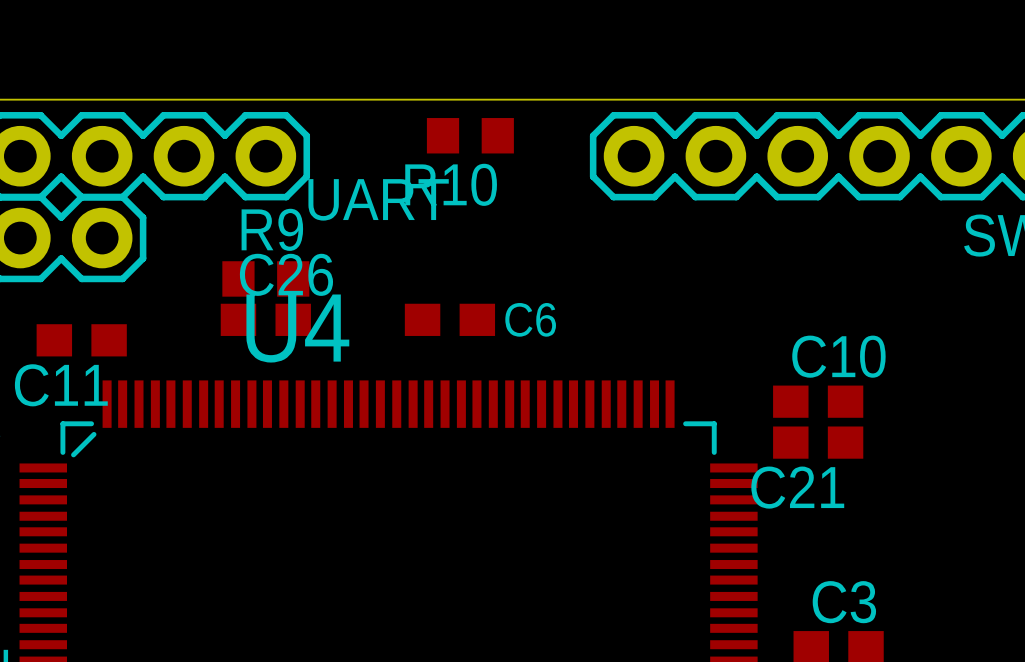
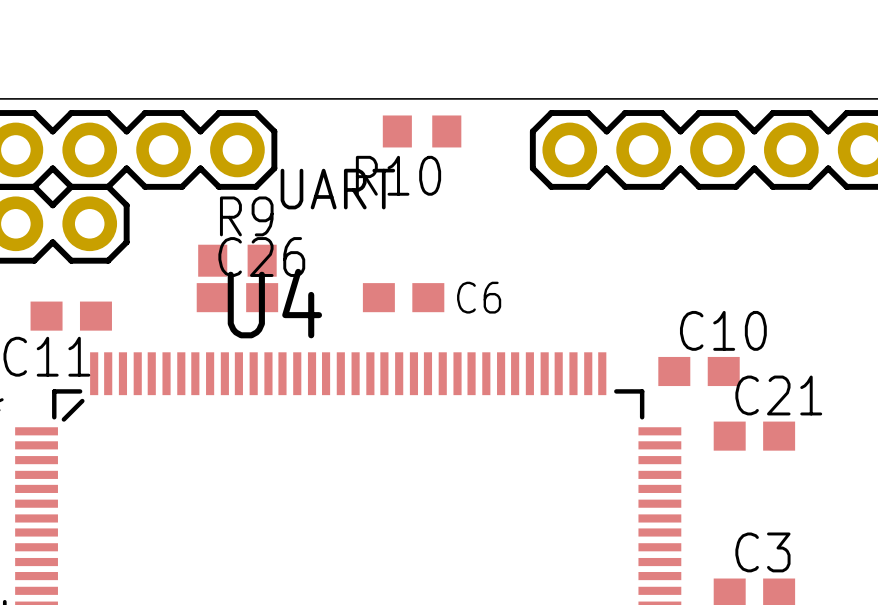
C10 position: (818, 401) -> (699, 371)
C21 position: (818, 442) -> (754, 436)
C21 name position: C21 (797, 487) -> C21 (778, 395)

